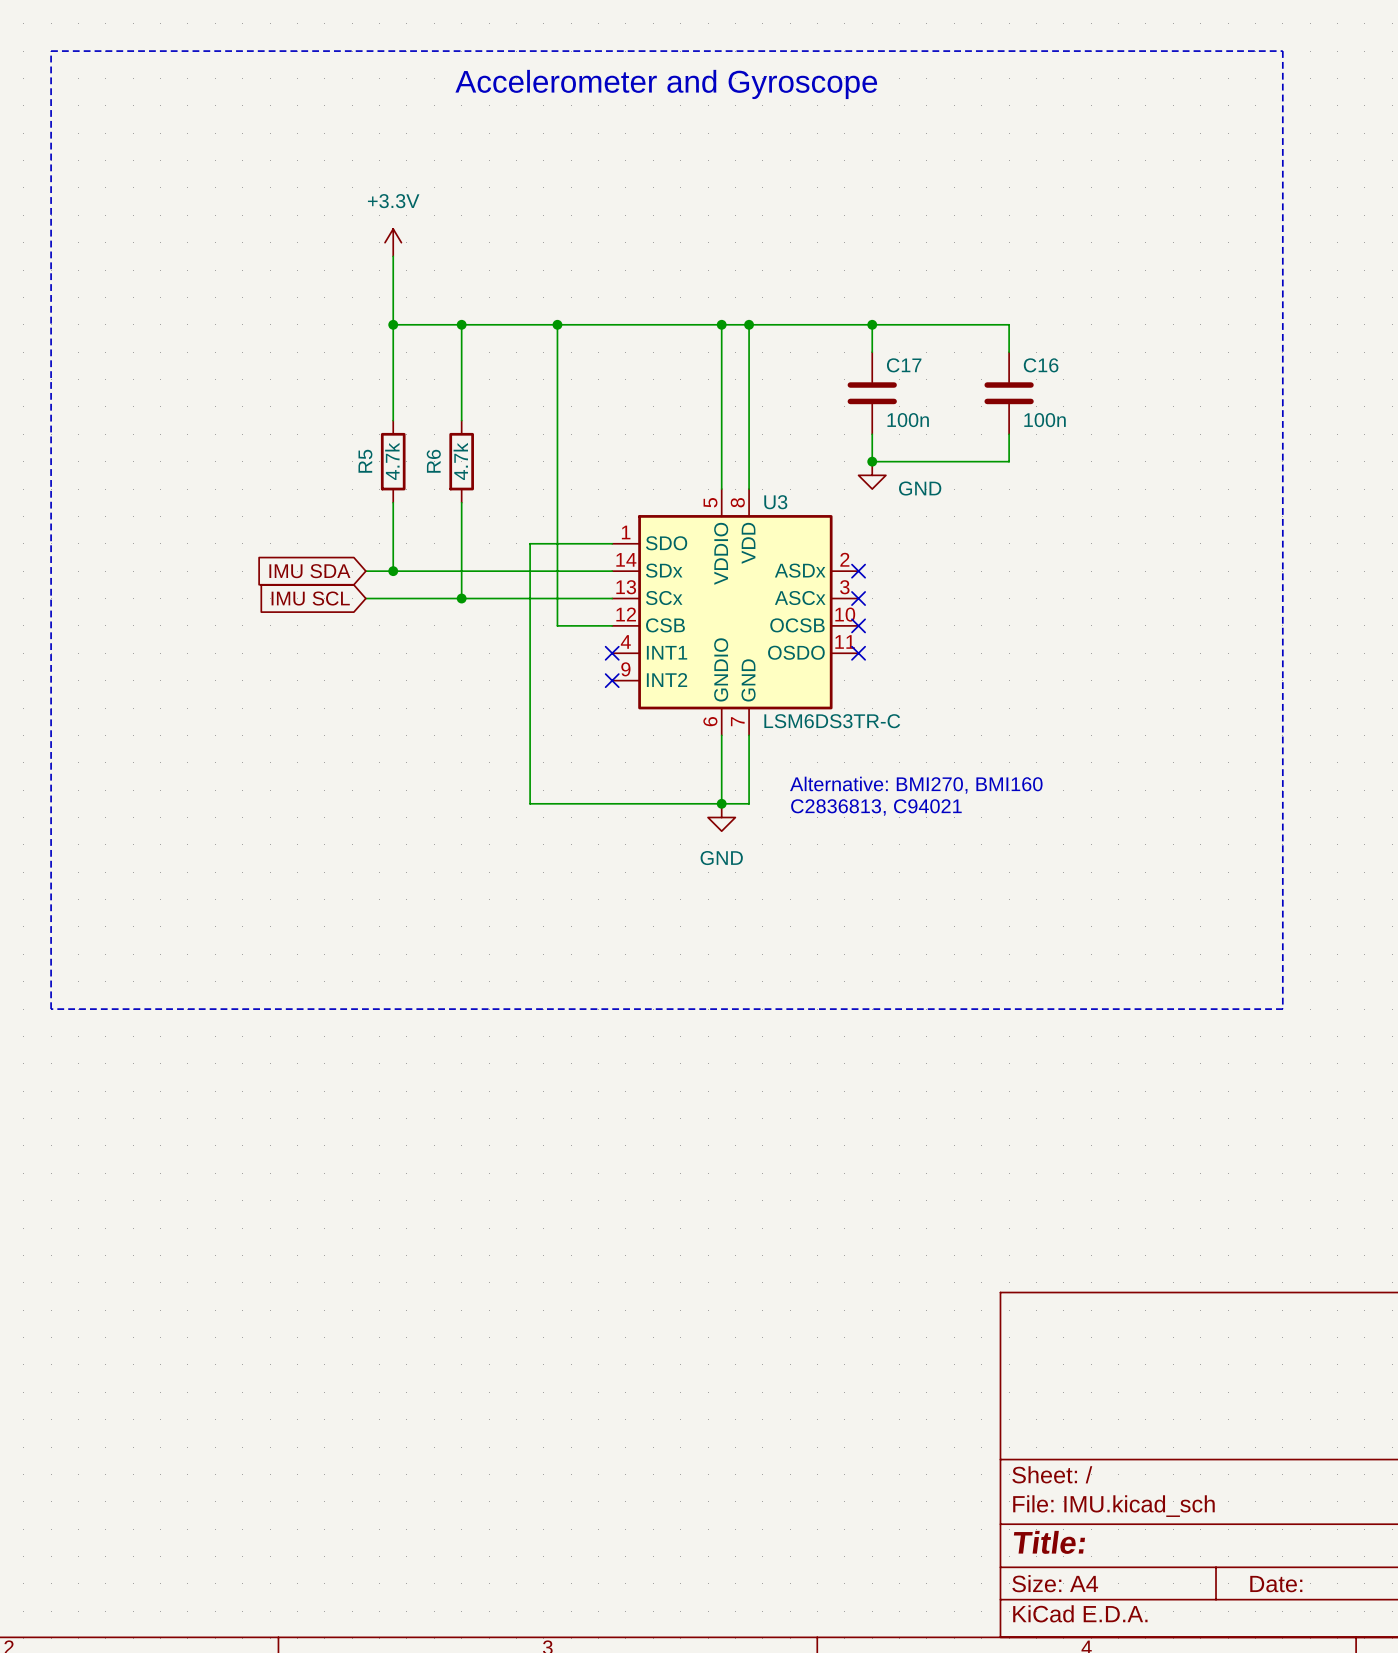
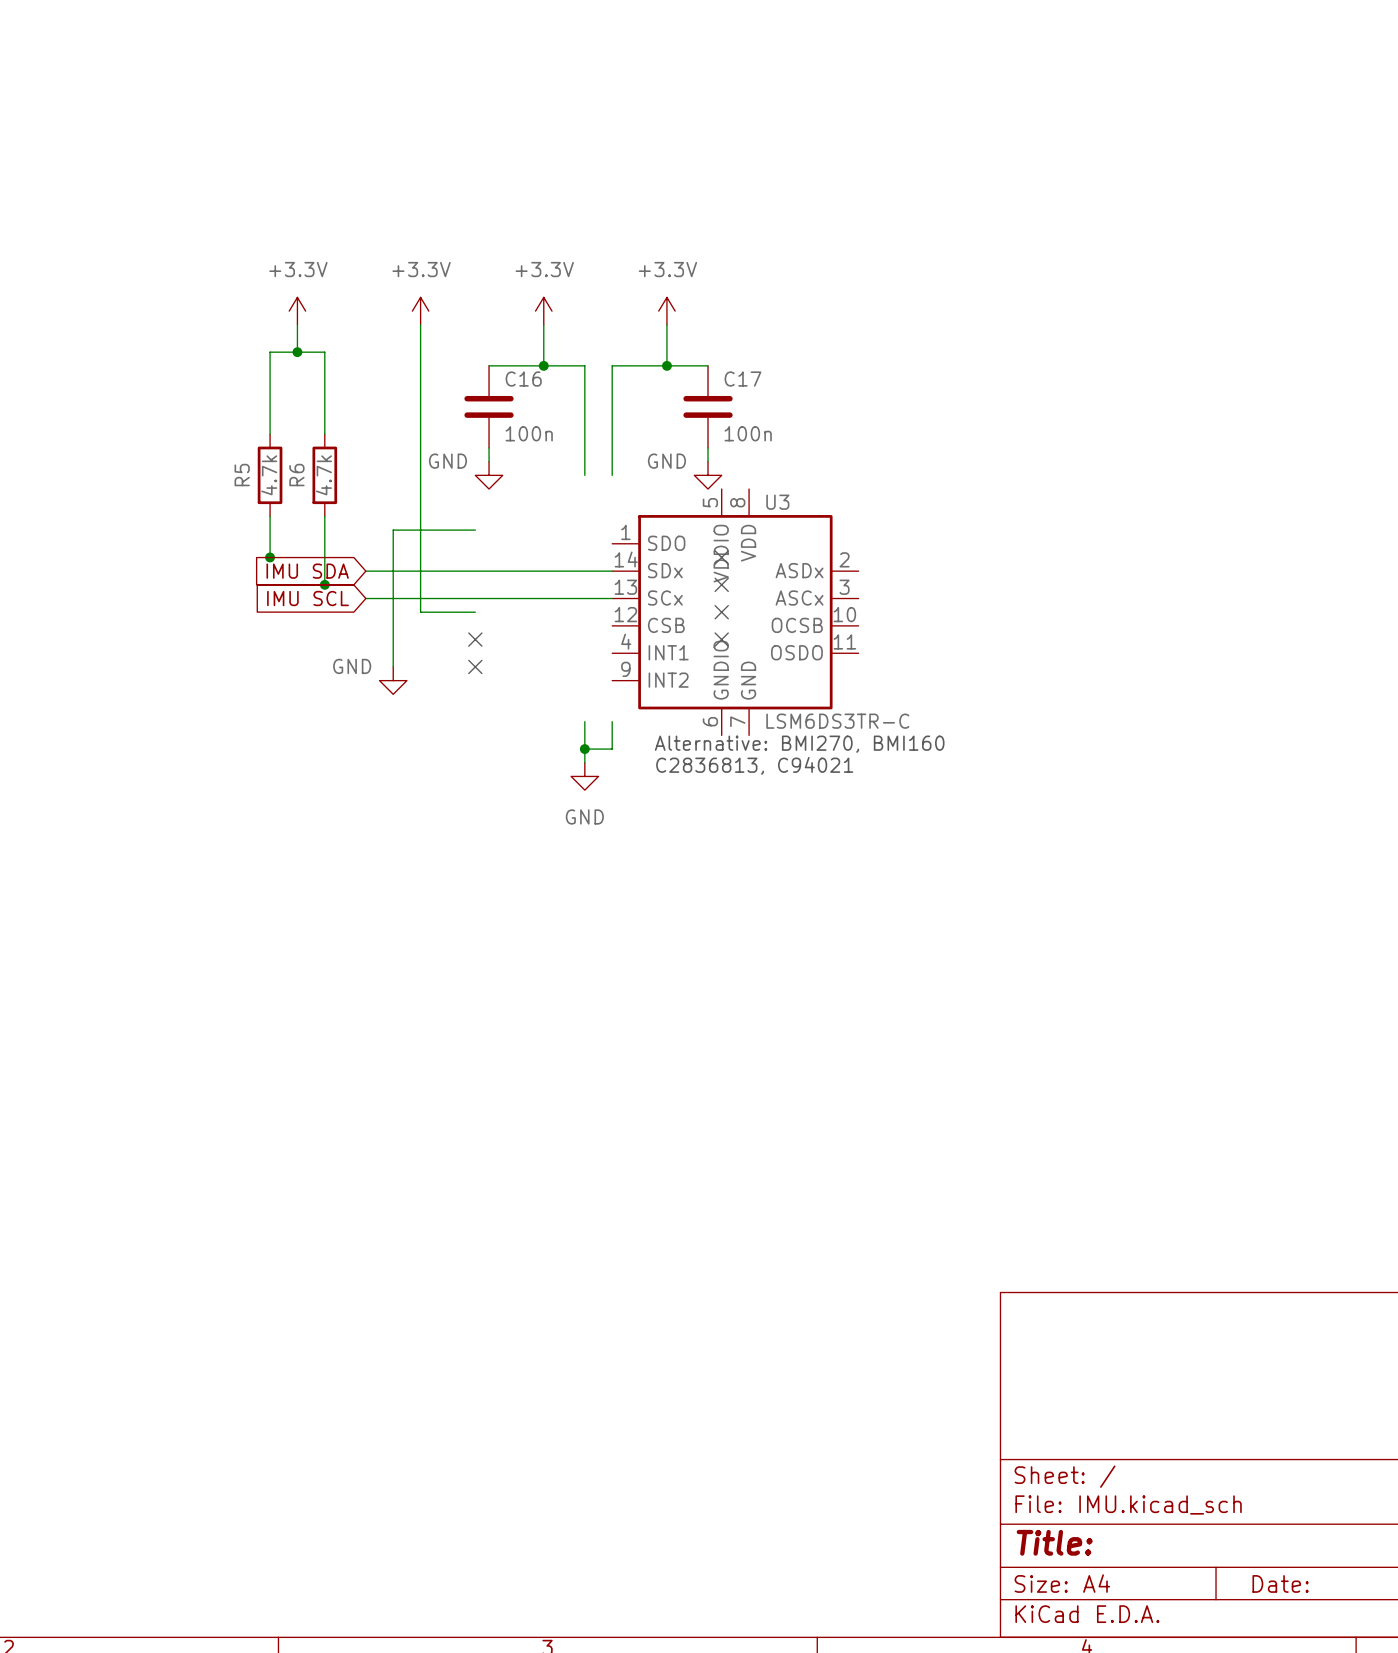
line: (51, 51) (1282, 51) (1282, 1009) (51, 1009) (51, 51) -> none
text: Accelerometer and Gyroscope (666, 84) -> none
power symbol: +3.3V (393, 242) -> none
wire: (393, 256) (393, 420) -> none
power symbol: none -> +3.3V (297, 311)
power symbol: none -> +3.3V (420, 311)
power symbol: none -> +3.3V (543, 311)
power symbol: none -> +3.3V (666, 311)
wire: none -> (297, 324) (297, 352)
wire: (393, 324) (1009, 324) (1009, 352) -> none
junction: (393, 324) -> none
wire: none -> (420, 324) (420, 612) (475, 612)
wire: (461, 324) (461, 420) -> none
junction: (461, 324) -> none
wire: none -> (543, 324) (543, 365)
wire: (557, 324) (557, 625) (612, 625) -> none
junction position: (557, 324) -> (543, 365)
wire: none -> (666, 324) (666, 365)
wire: (721, 324) (721, 489) -> none
junction: (721, 324) -> none
wire: (749, 324) (749, 489) -> none
junction: (749, 324) -> none
wire: (872, 324) (872, 352) -> none
junction: (872, 324) -> none
junction: none -> (297, 352)
wire: none -> (489, 365) (584, 365) (584, 475)
junction: none -> (666, 365)
wire: none -> (708, 365) (612, 365) (612, 475)
C17 position: (872, 393) -> (708, 406)
C16 position: (1009, 393) -> (489, 406)
wire: none -> (270, 434) (270, 352) (324, 352) (324, 434)
wire: (872, 434) (872, 461) (1009, 461) (1009, 434) -> none
wire: none -> (489, 447) (489, 461)
wire: none -> (708, 447) (708, 461)
R5 position: (393, 461) -> (270, 475)
R6 position: (461, 461) -> (324, 475)
junction: (872, 461) -> none
power symbol: none -> GND (489, 475)
power symbol position: GND (872, 475) -> GND (708, 475)
power symbol text position: GND (920, 488) -> GND (666, 461)
wire: (393, 502) (393, 530) -> (475, 530) (393, 530)
wire: (461, 502) (461, 598) -> (393, 571) (393, 666)
wire: none -> (270, 516) (270, 557)
wire: none -> (324, 516) (324, 584)
wire: (612, 543) (530, 543) (530, 803) (749, 803) (749, 735) -> none
junction: none -> (270, 557)
no-connect mark: none -> (721, 557)
junction: (393, 571) -> none
no-connect mark: (858, 571) -> none
junction: none -> (324, 584)
no-connect mark: none -> (721, 584)
junction: (461, 598) -> none
no-connect mark: (858, 598) -> none
no-connect mark: none -> (721, 612)
no-connect mark: (858, 625) -> none
no-connect mark: none -> (475, 639)
no-connect mark: none -> (721, 639)
no-connect mark: (612, 653) -> none
no-connect mark: (858, 653) -> none
no-connect mark: none -> (475, 666)
power symbol: none -> GND (393, 680)
no-connect mark: (612, 680) -> none
wire: none -> (584, 721) (584, 762)
wire: none -> (612, 721) (612, 749) (584, 749)
wire: (721, 735) (721, 803) -> none
junction: none -> (584, 749)
text position: Alternative: BMI270, BMI160 (916, 785) -> Alternative: BMI270, BMI160 (799, 744)
junction: (721, 803) -> none
text position: C2836813, C94021 (876, 807) -> C2836813, C94021 (754, 765)
power symbol position: GND (721, 817) -> GND (584, 776)

